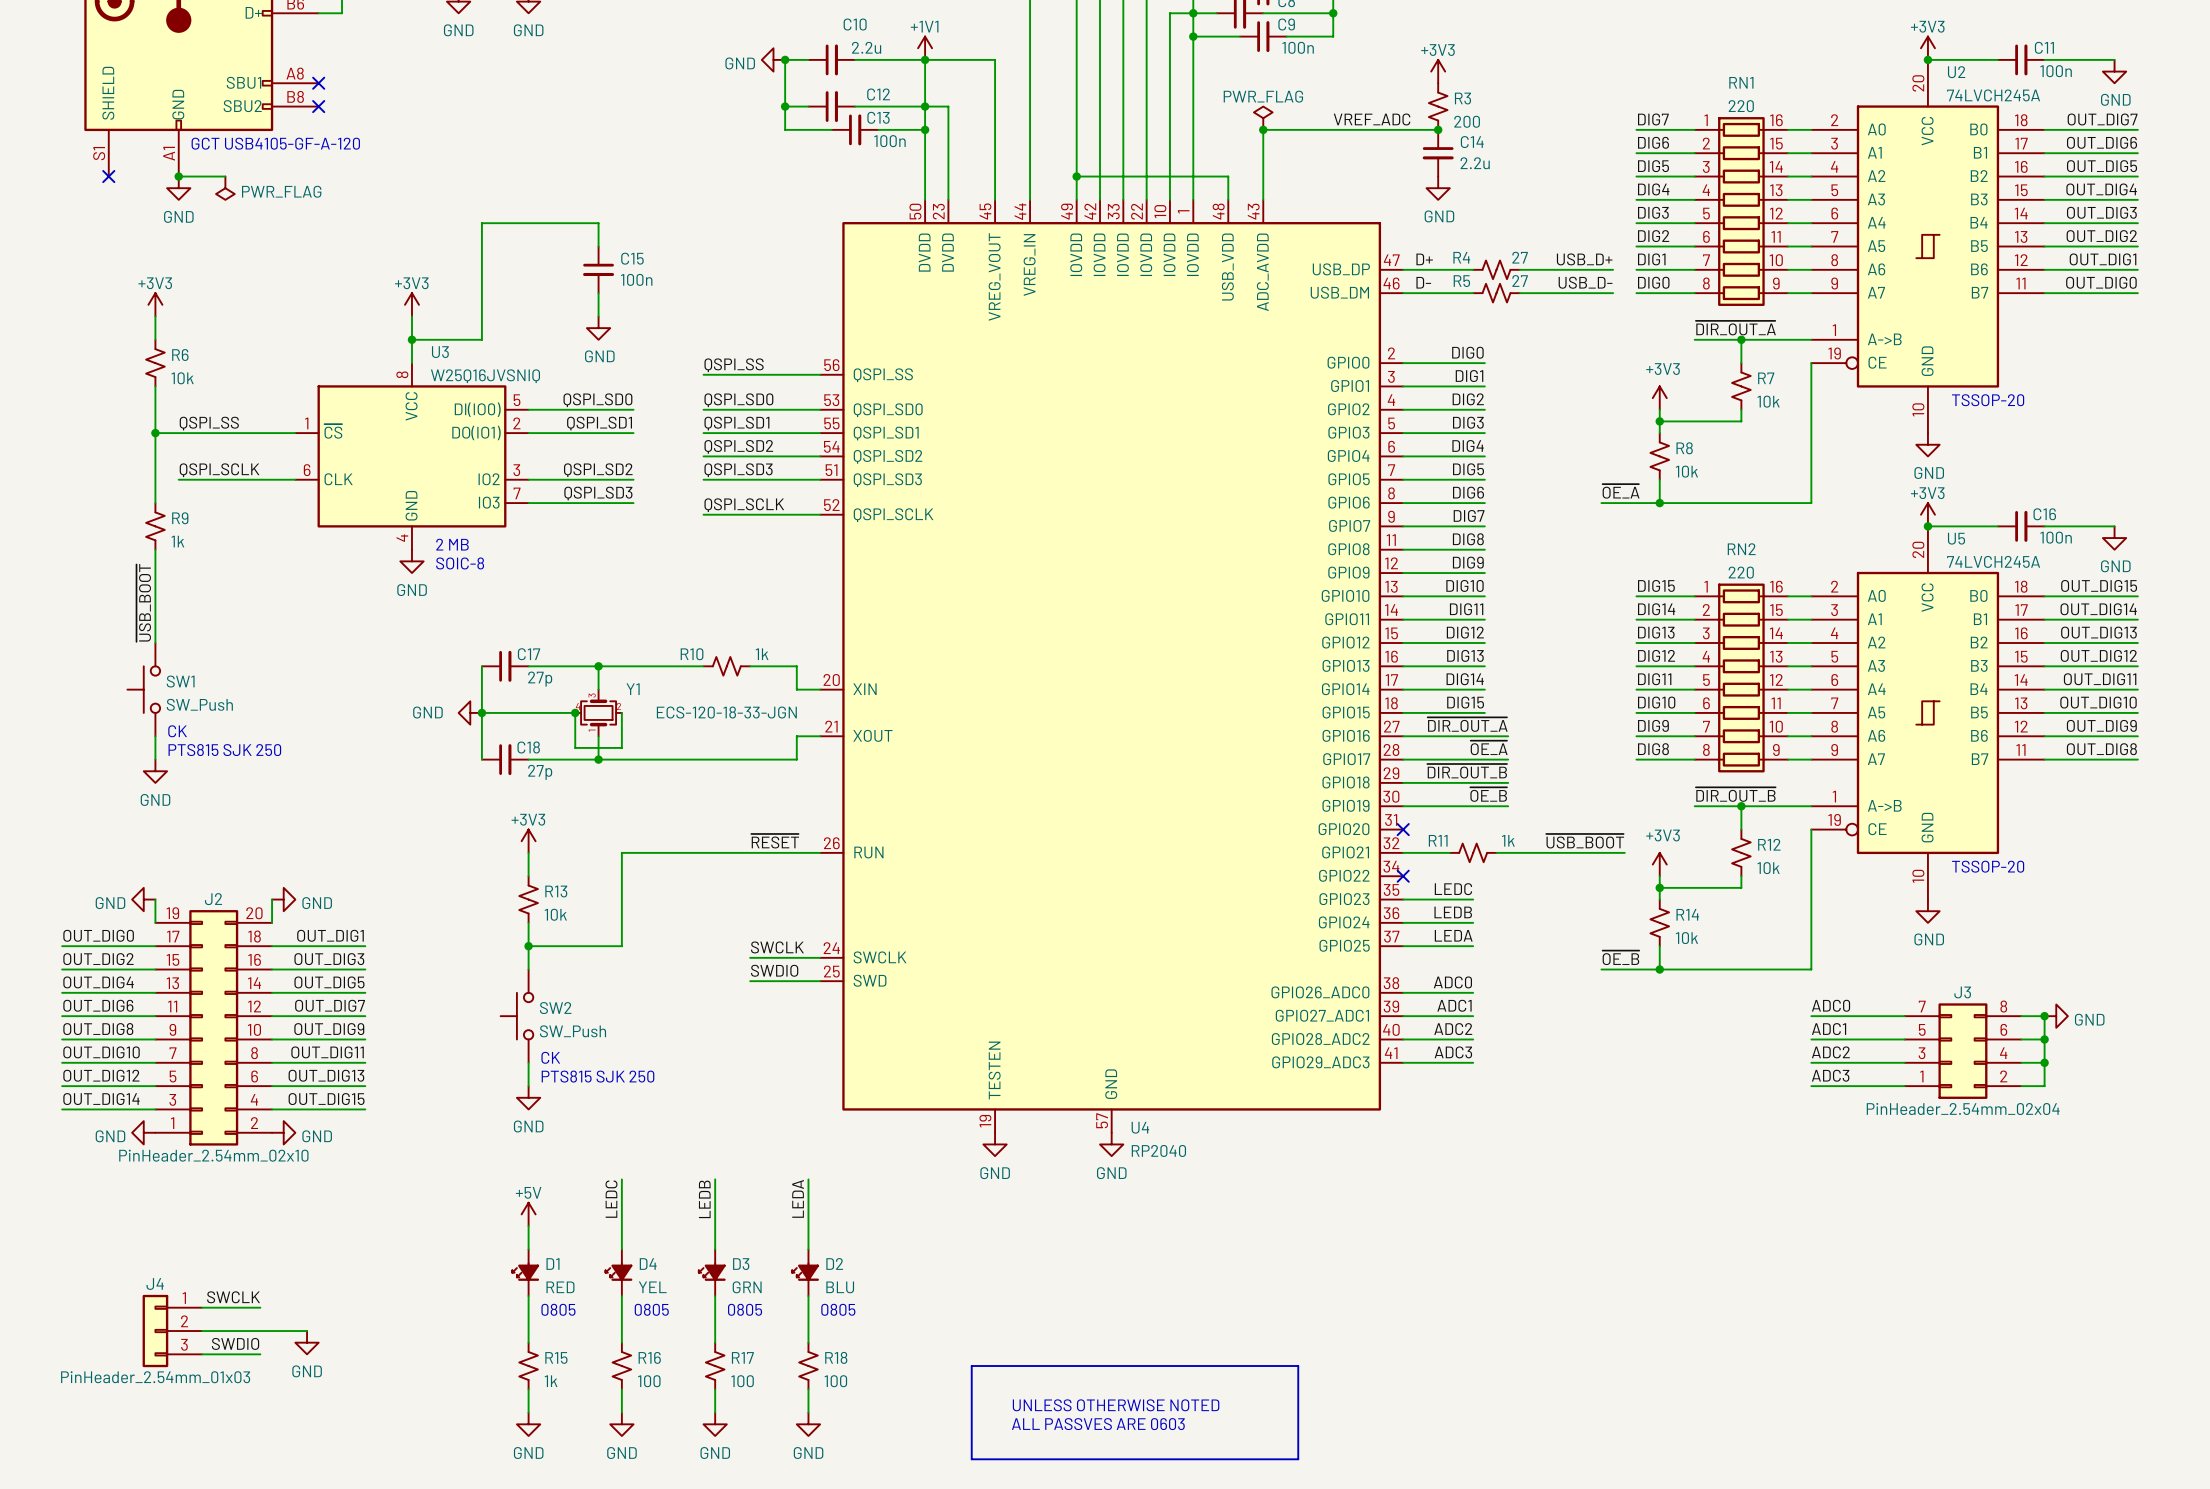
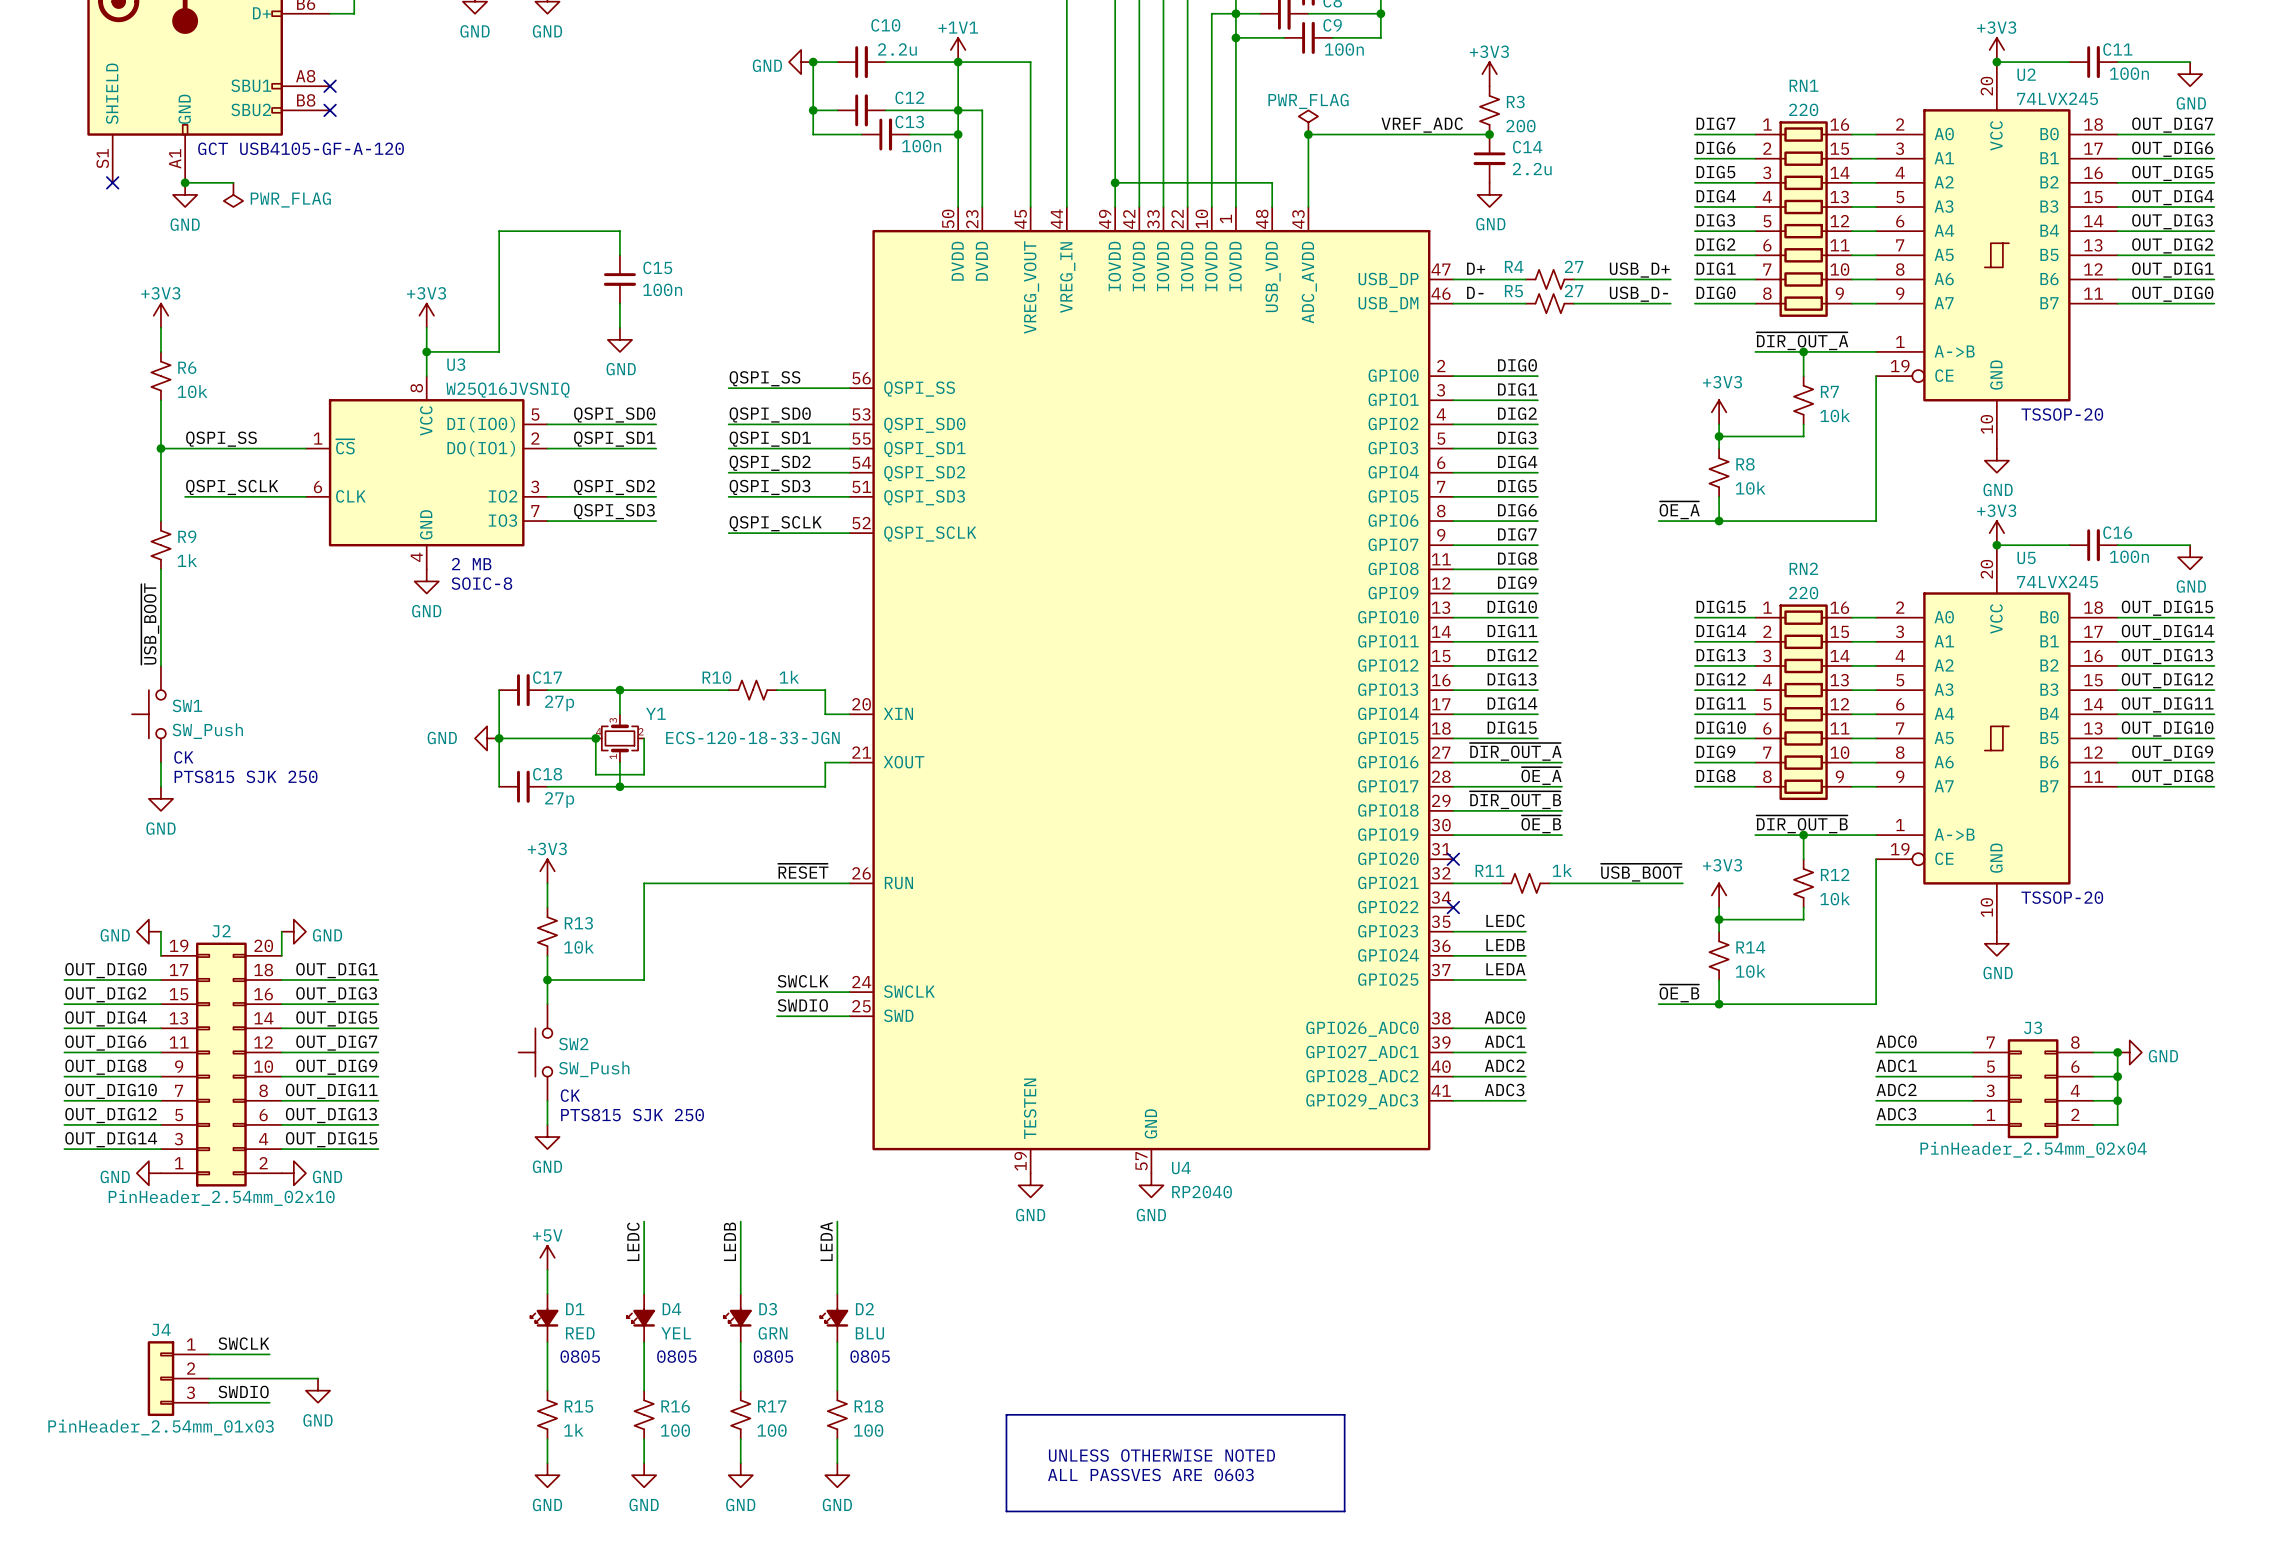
U2 value: 74LVCH245A (1993, 95) -> 74LVX245 (2057, 98)
U5 value: 74LVCH245A (1993, 561) -> 74LVX245 (2057, 581)

